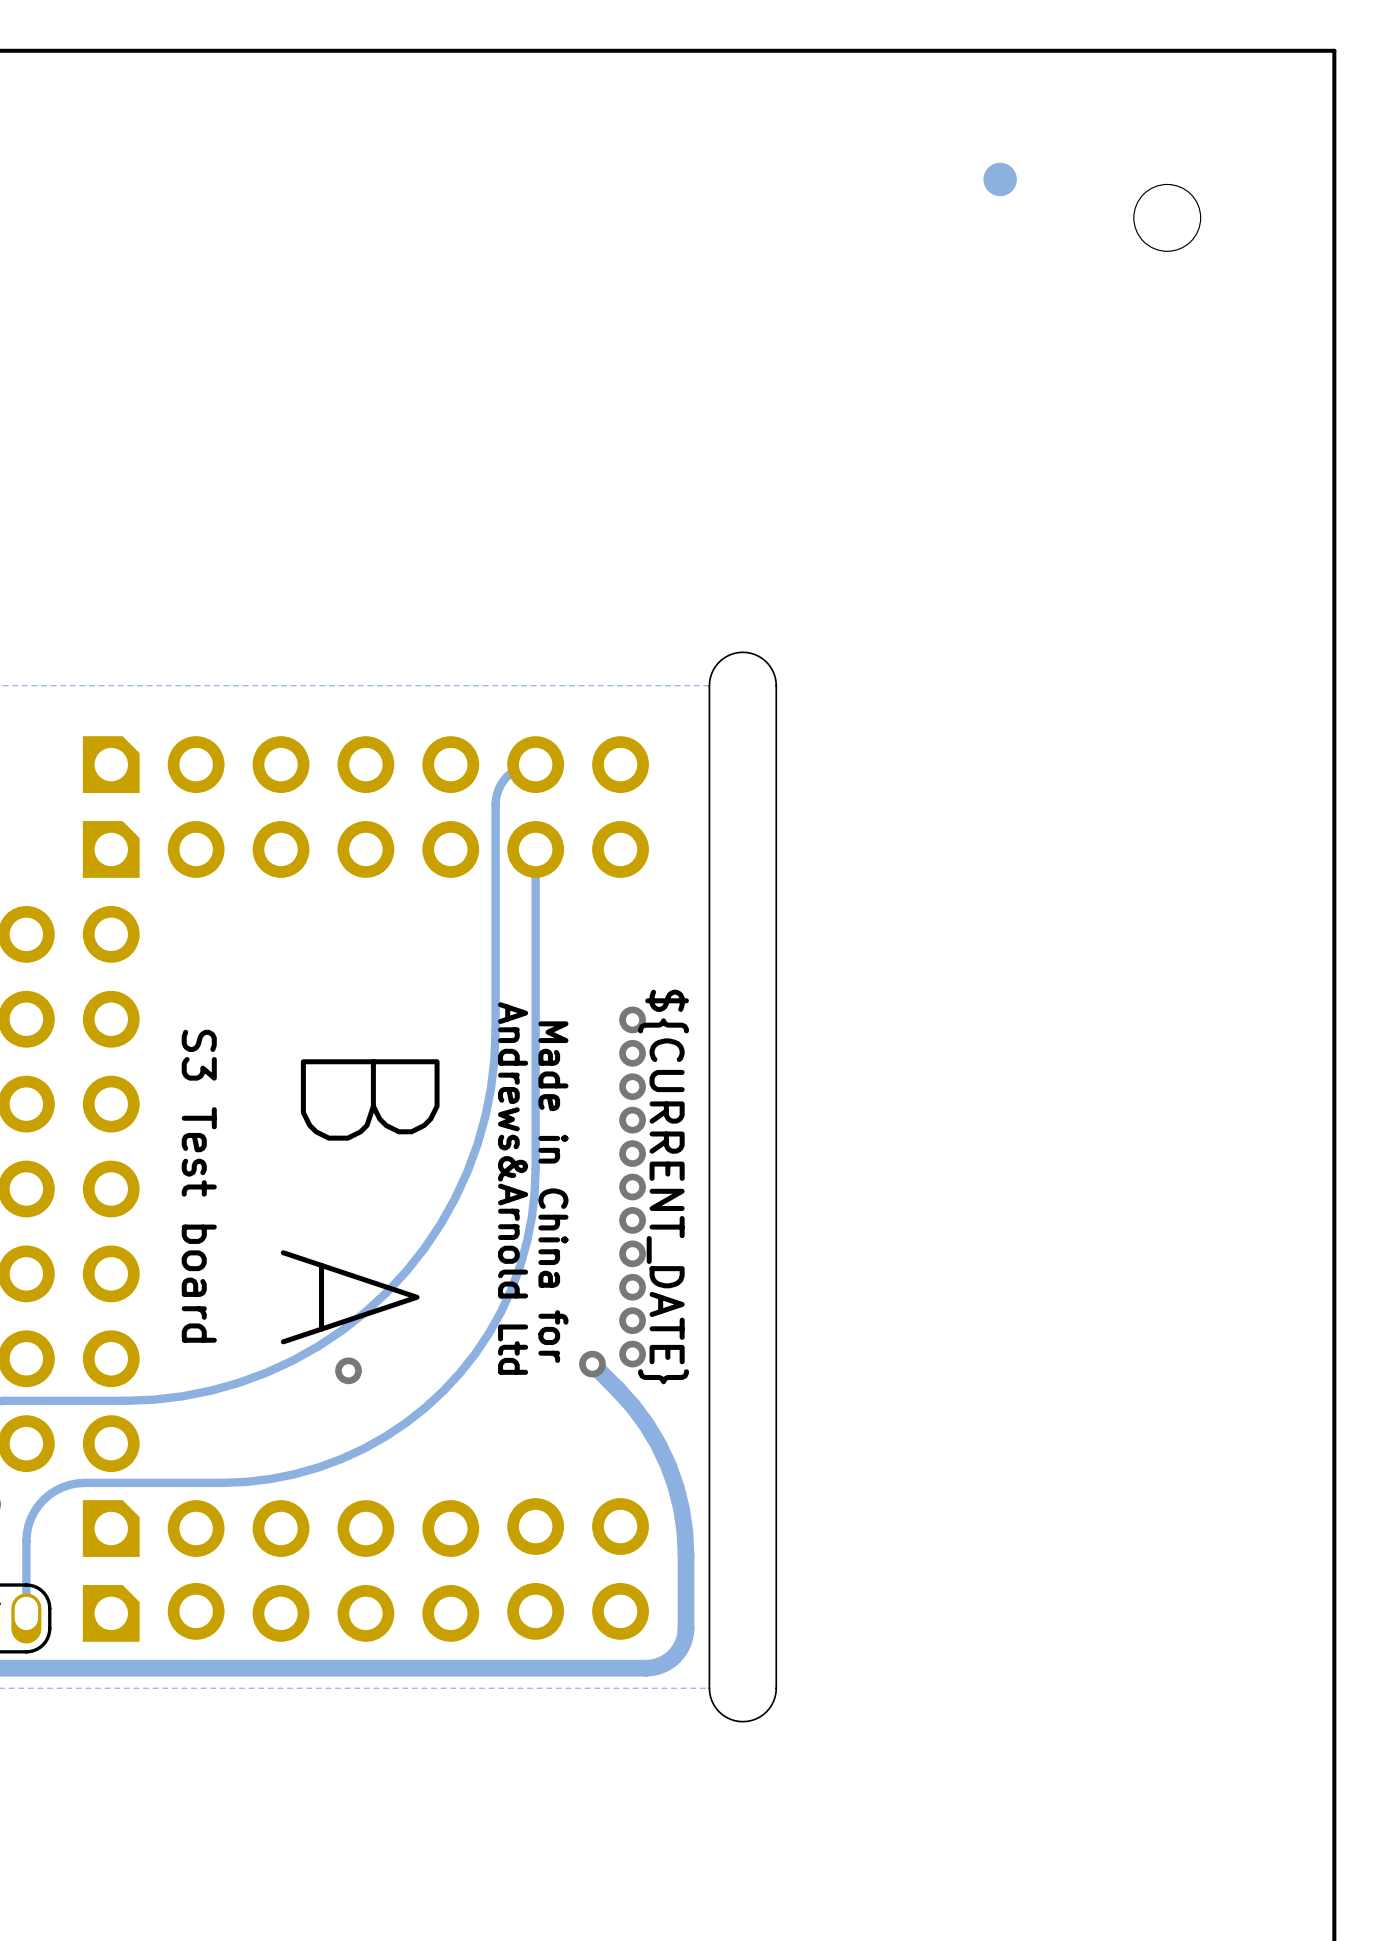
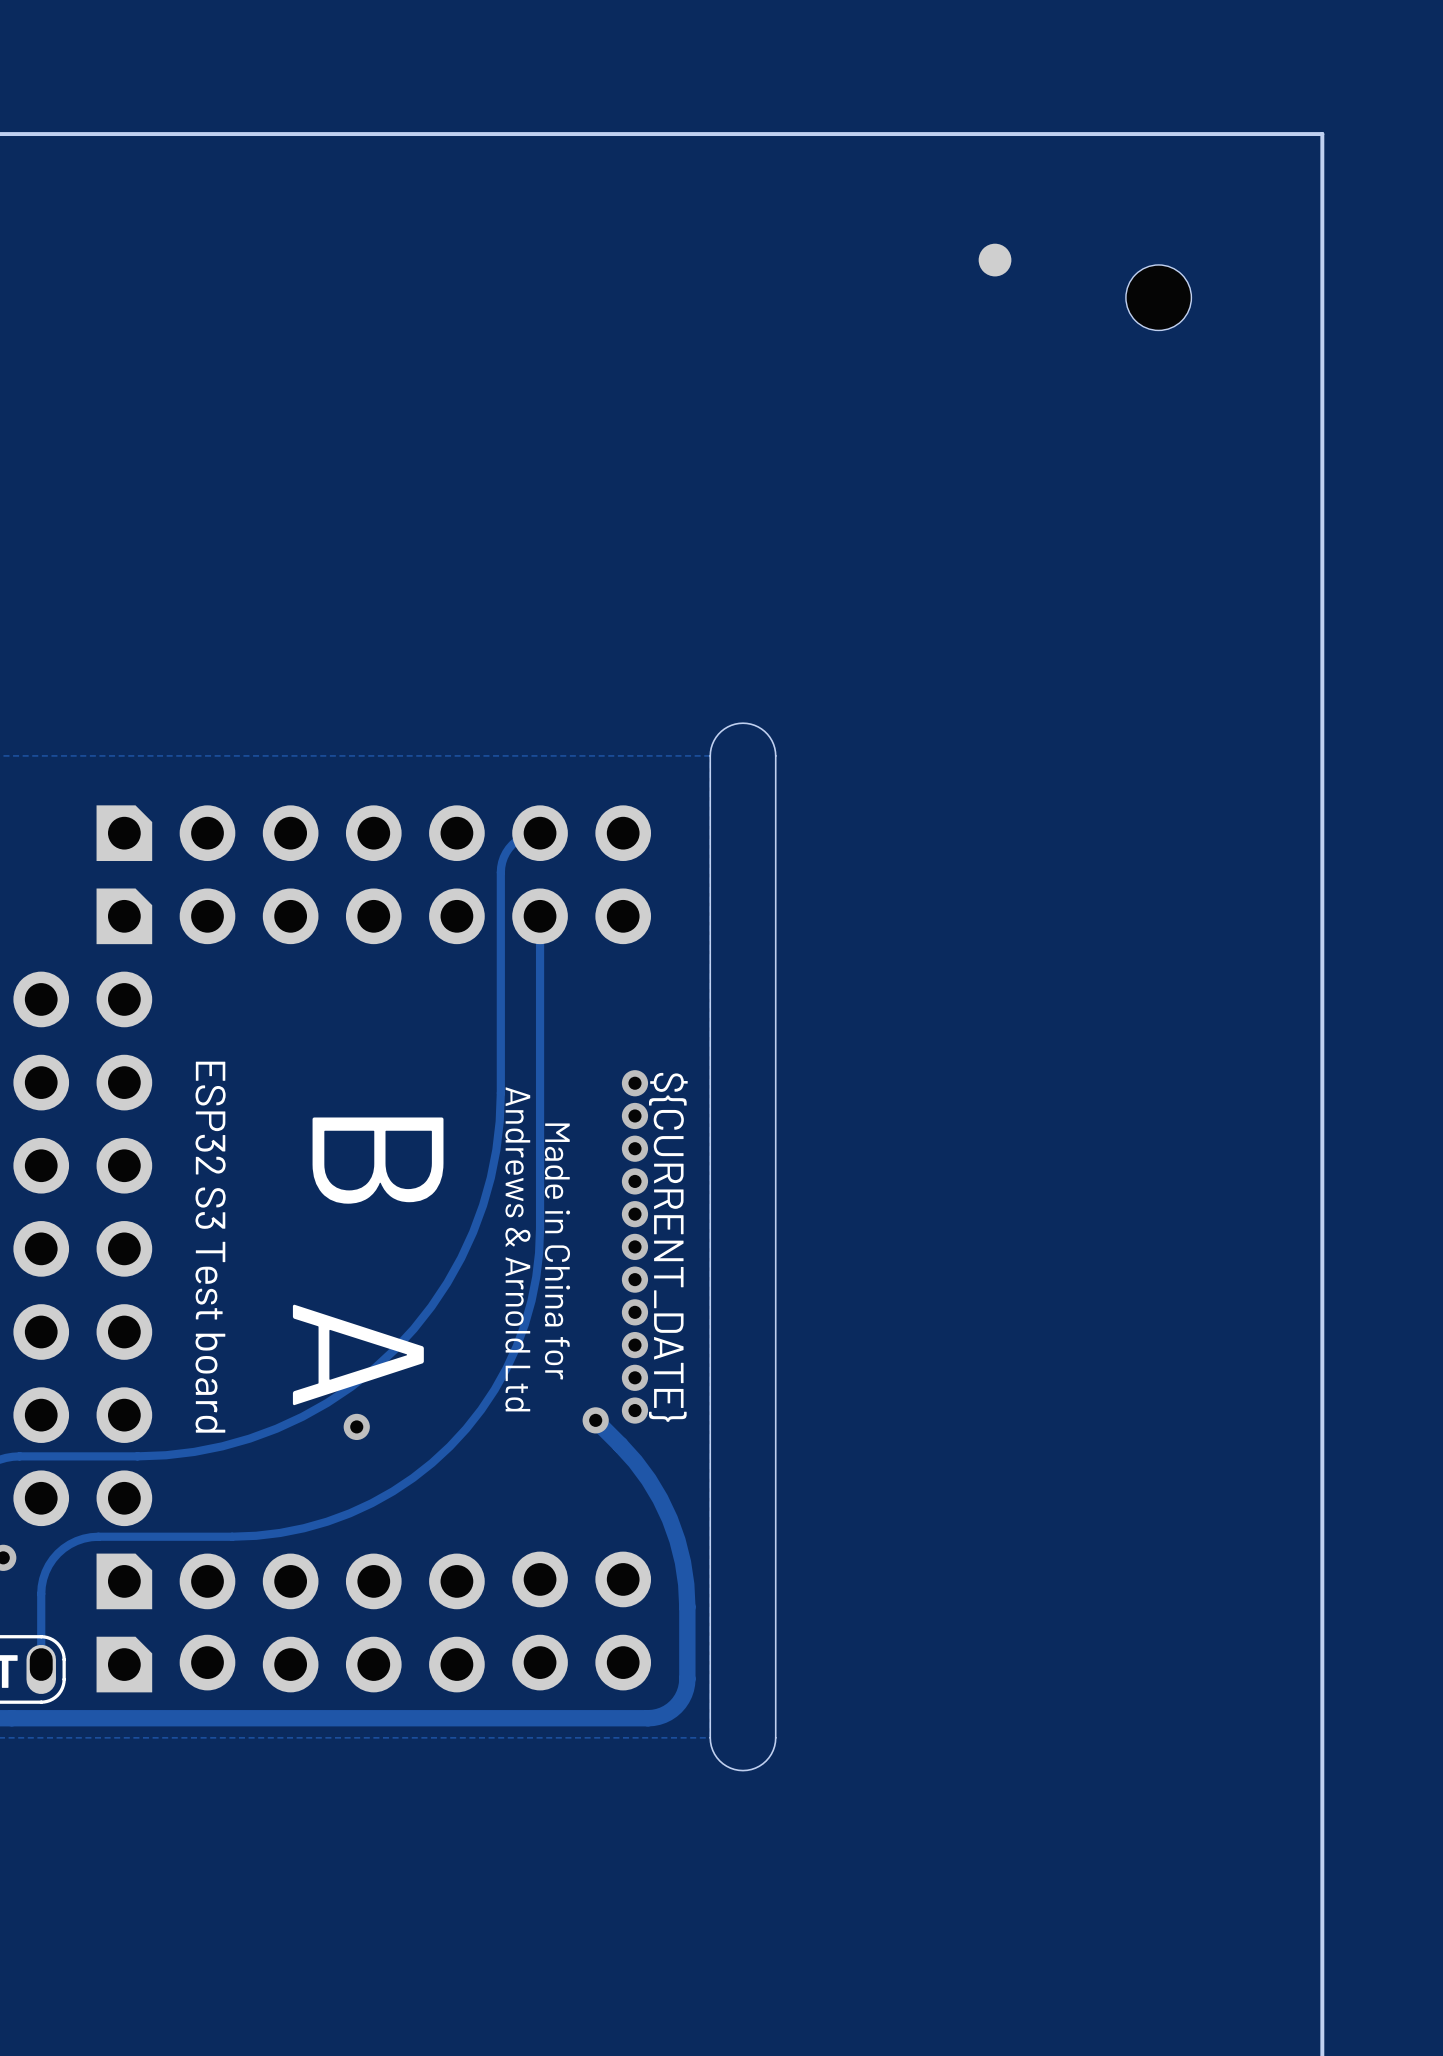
text: S3 Test board (199, 1186) -> ESP32 S3 Test board (210, 1247)
text: Andrews&Arnold Ltd (513, 1188) -> Andrews & Arnold Ltd (517, 1249)

